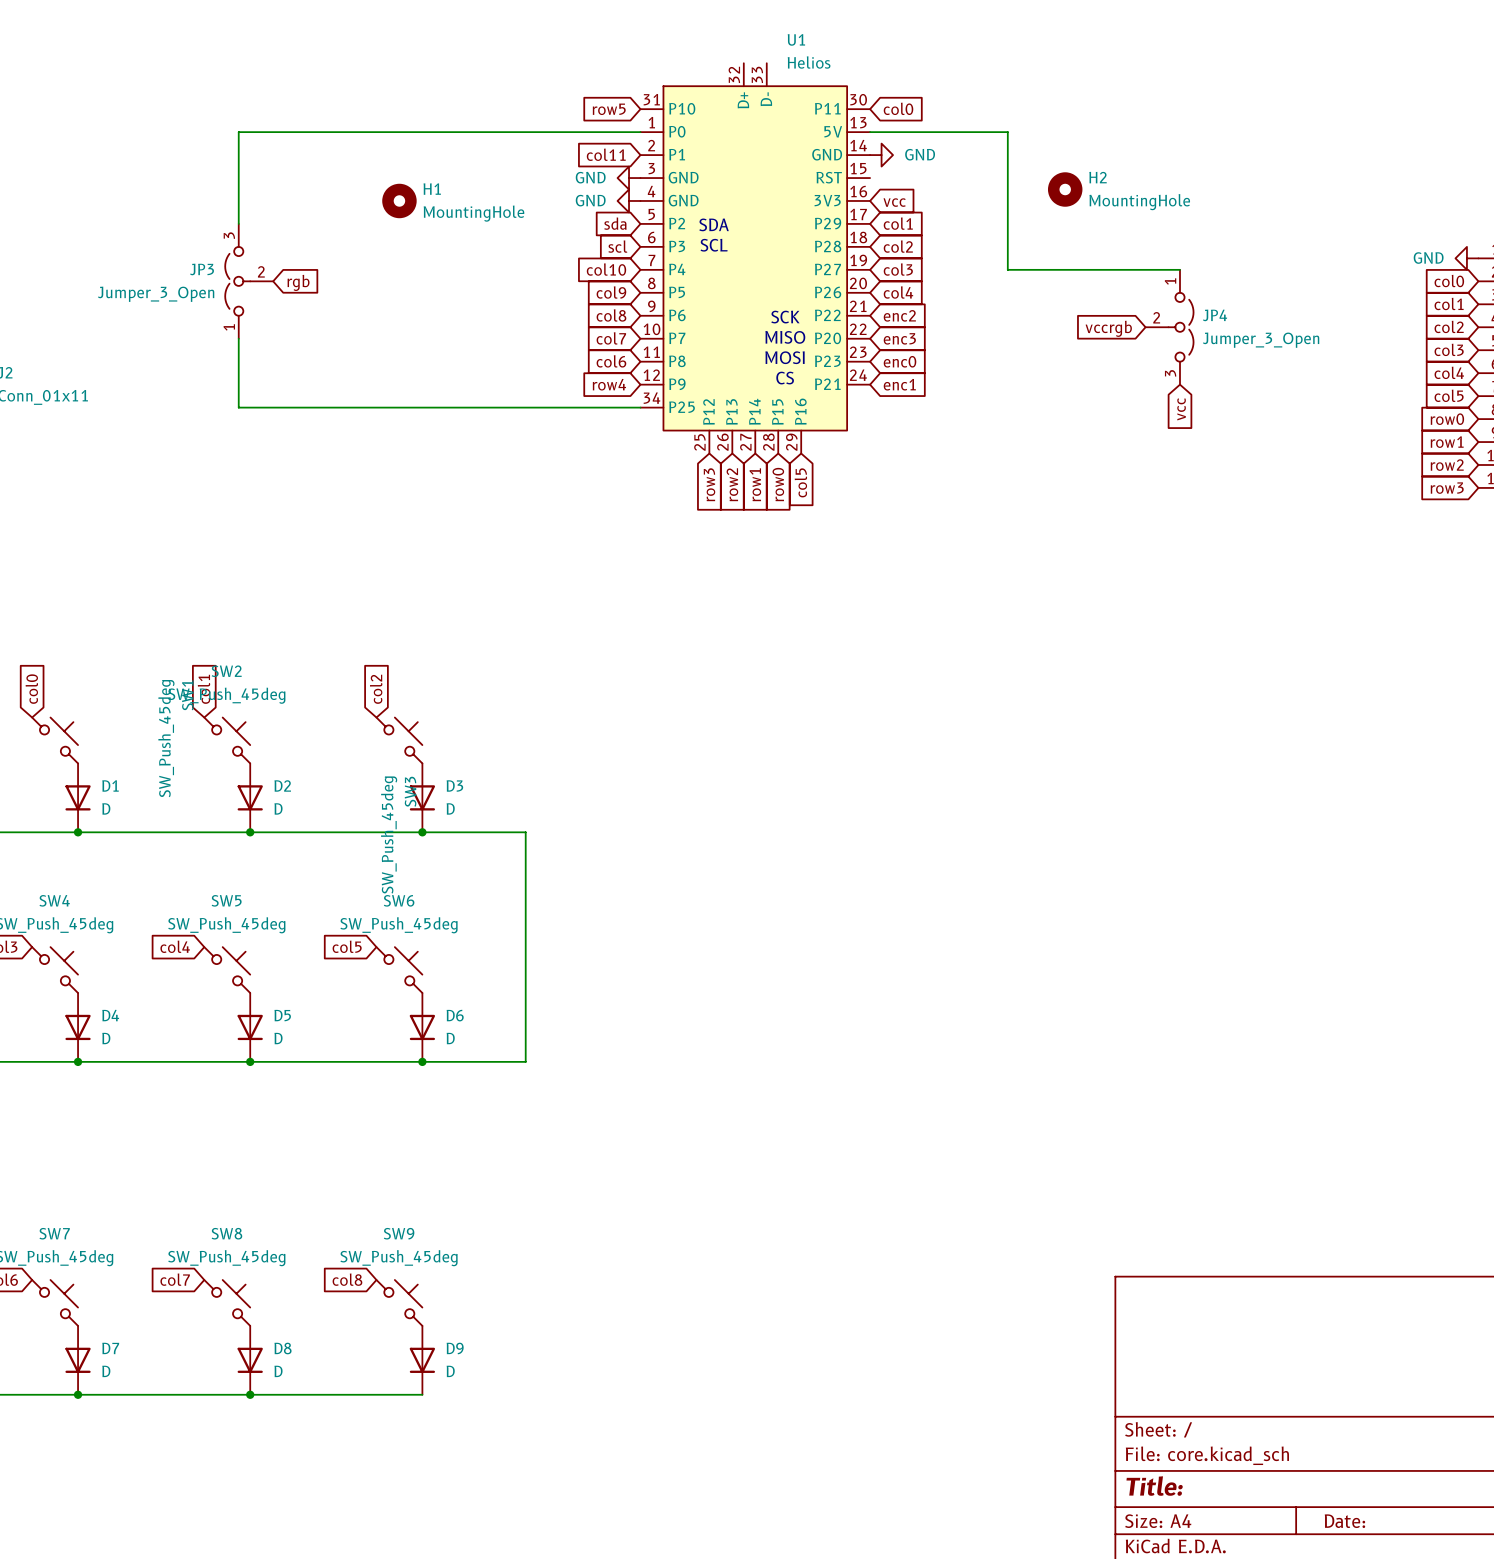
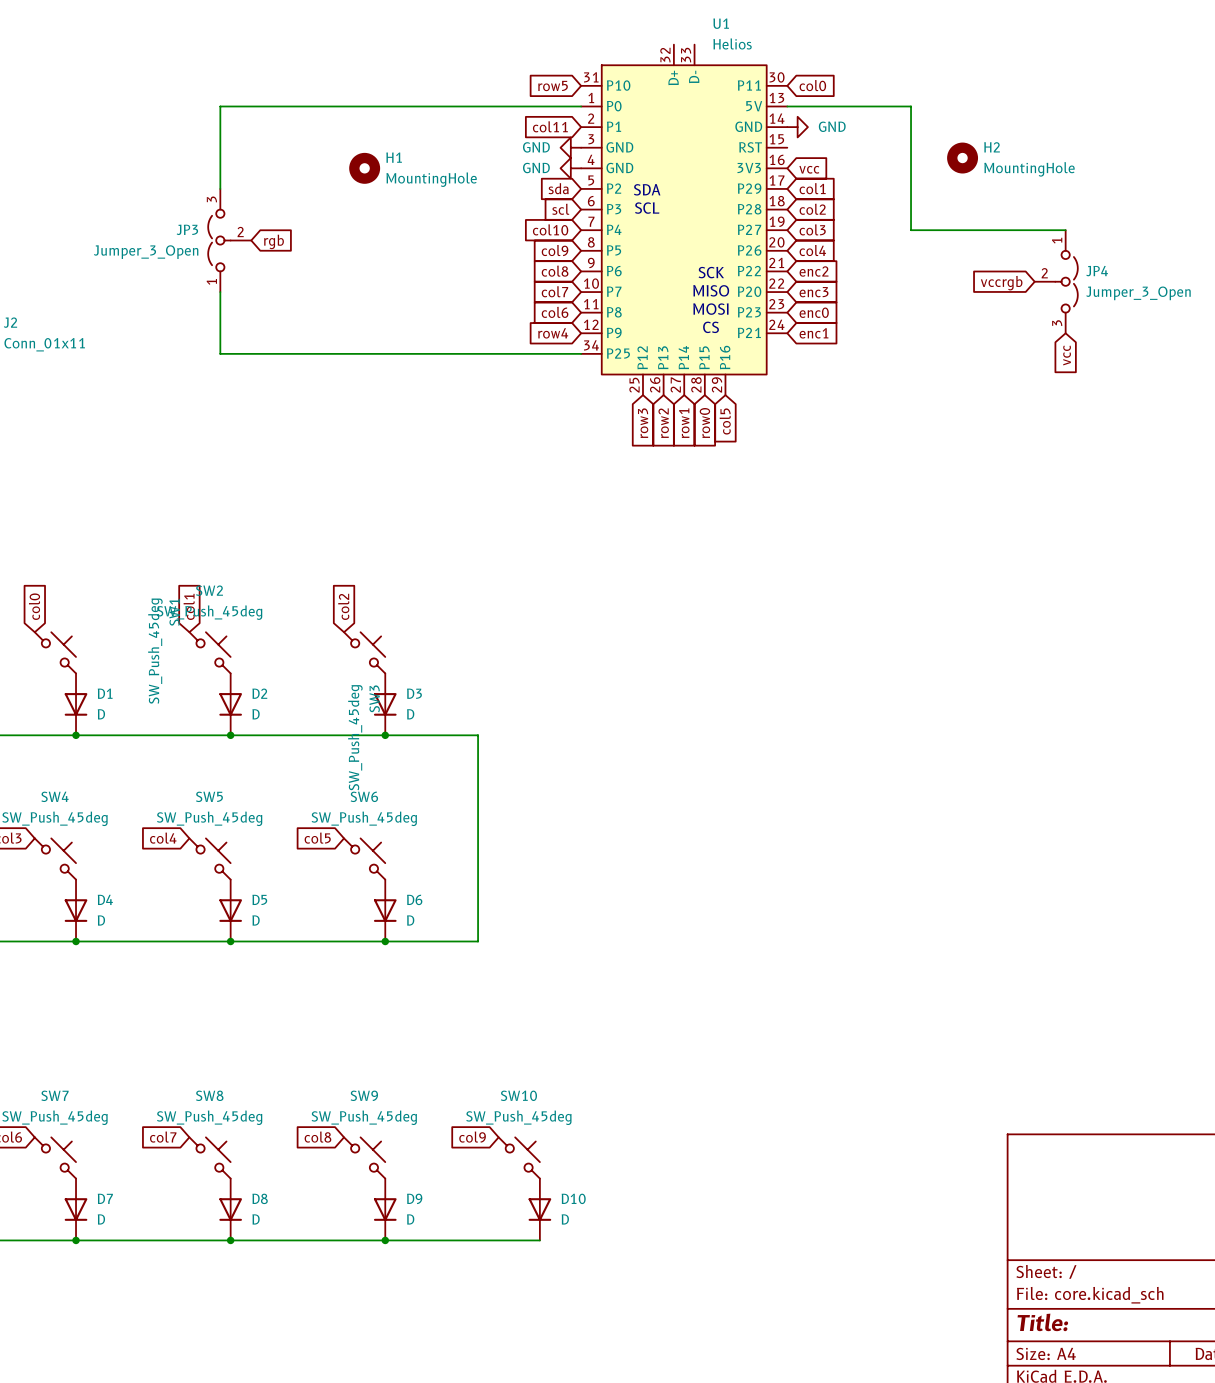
global label: none -> col9 (472, 1137)
SW10: none -> SW_Push_45deg (519, 1157)
D10: none -> D (539, 1209)
wire: none -> (385, 1240) (539, 1240)
junction: none -> (385, 1240)

